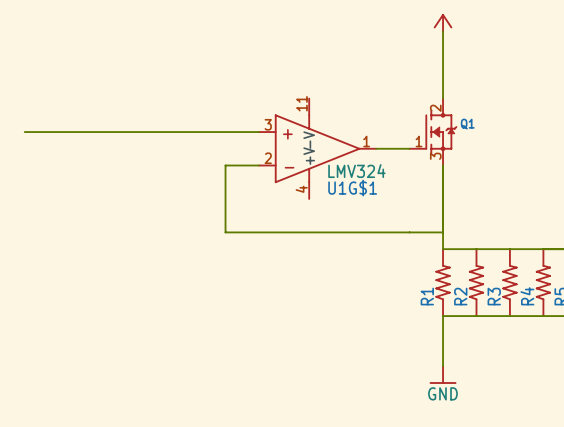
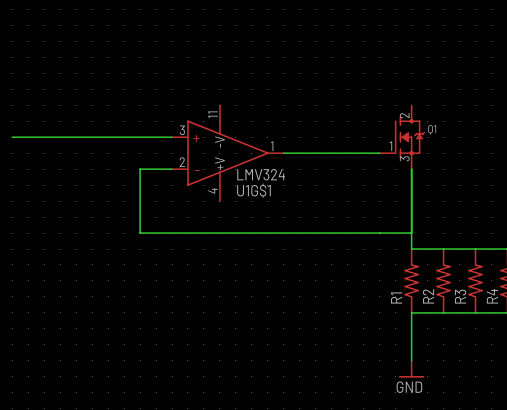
power symbol: (443, 22) -> none
wire: (443, 31) (443, 98) -> none
wire: (192, 132) (258, 132) -> (283, 153) (347, 153)
U1G$1 position: (317, 148) -> (227, 153)
wire: (258, 165) (225, 165) (225, 232) -> (172, 169) (140, 169) (140, 233) (203, 233)

